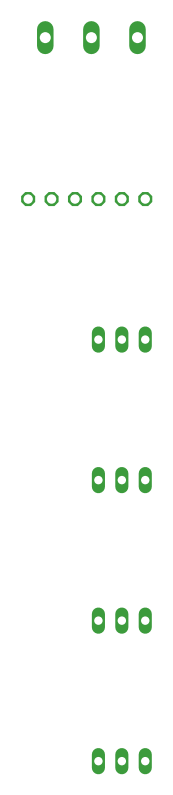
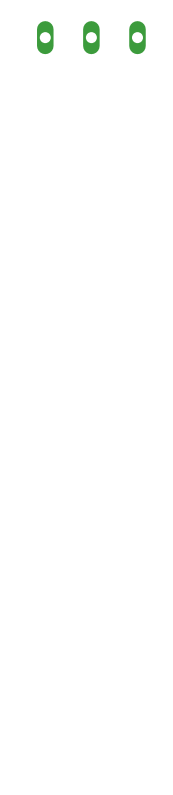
part: (86, 199) -> none
part: (121, 339) -> none
part: (121, 480) -> none
part: (121, 620) -> none
part: (121, 761) -> none

